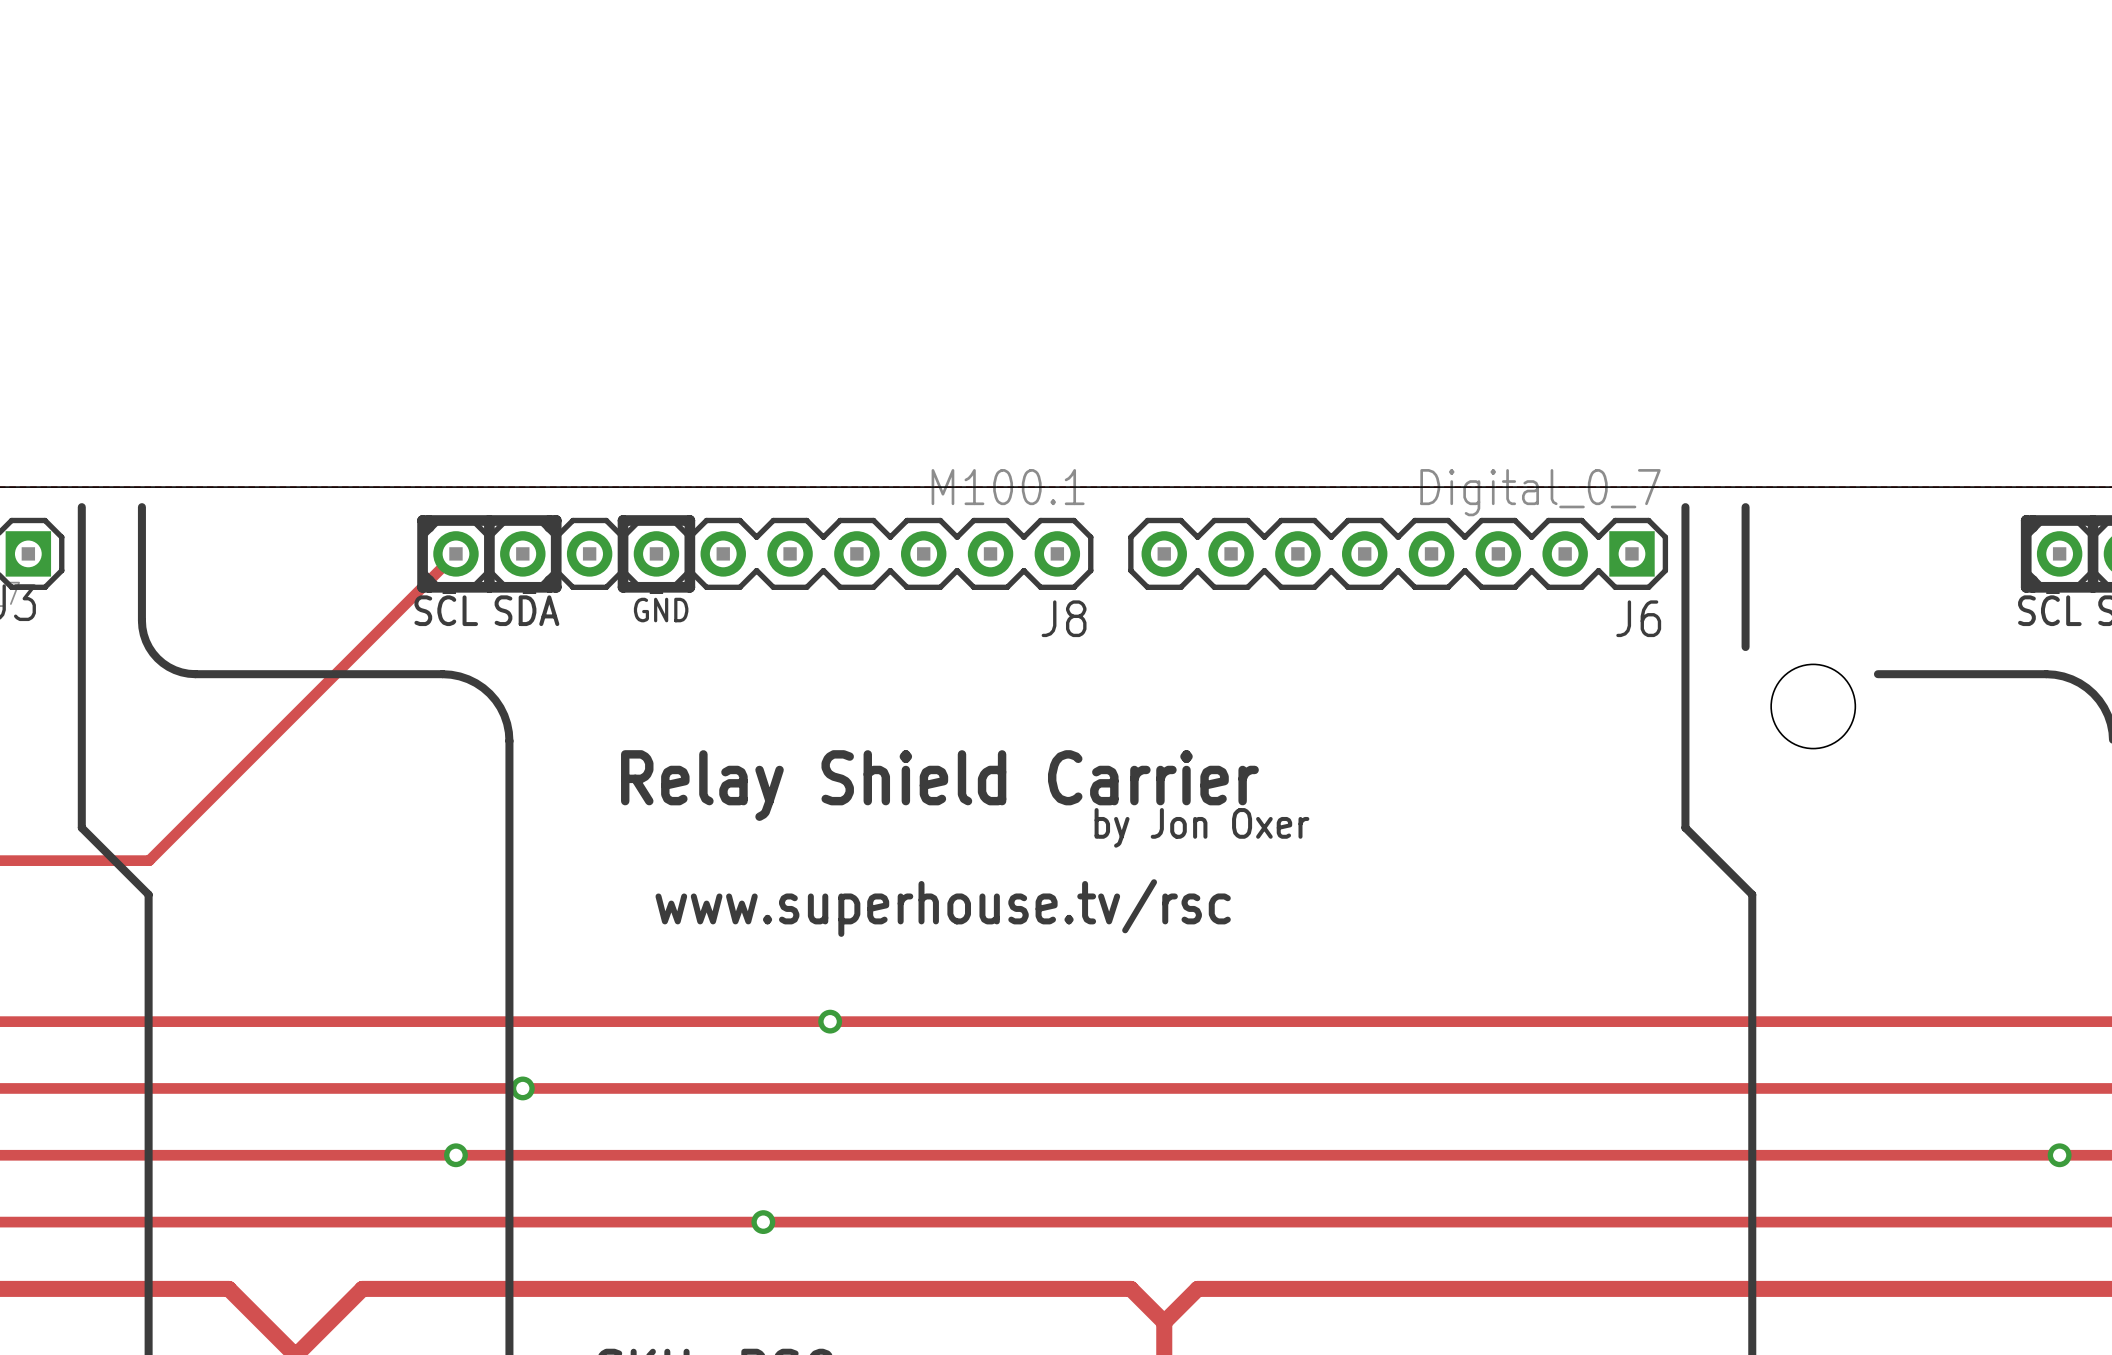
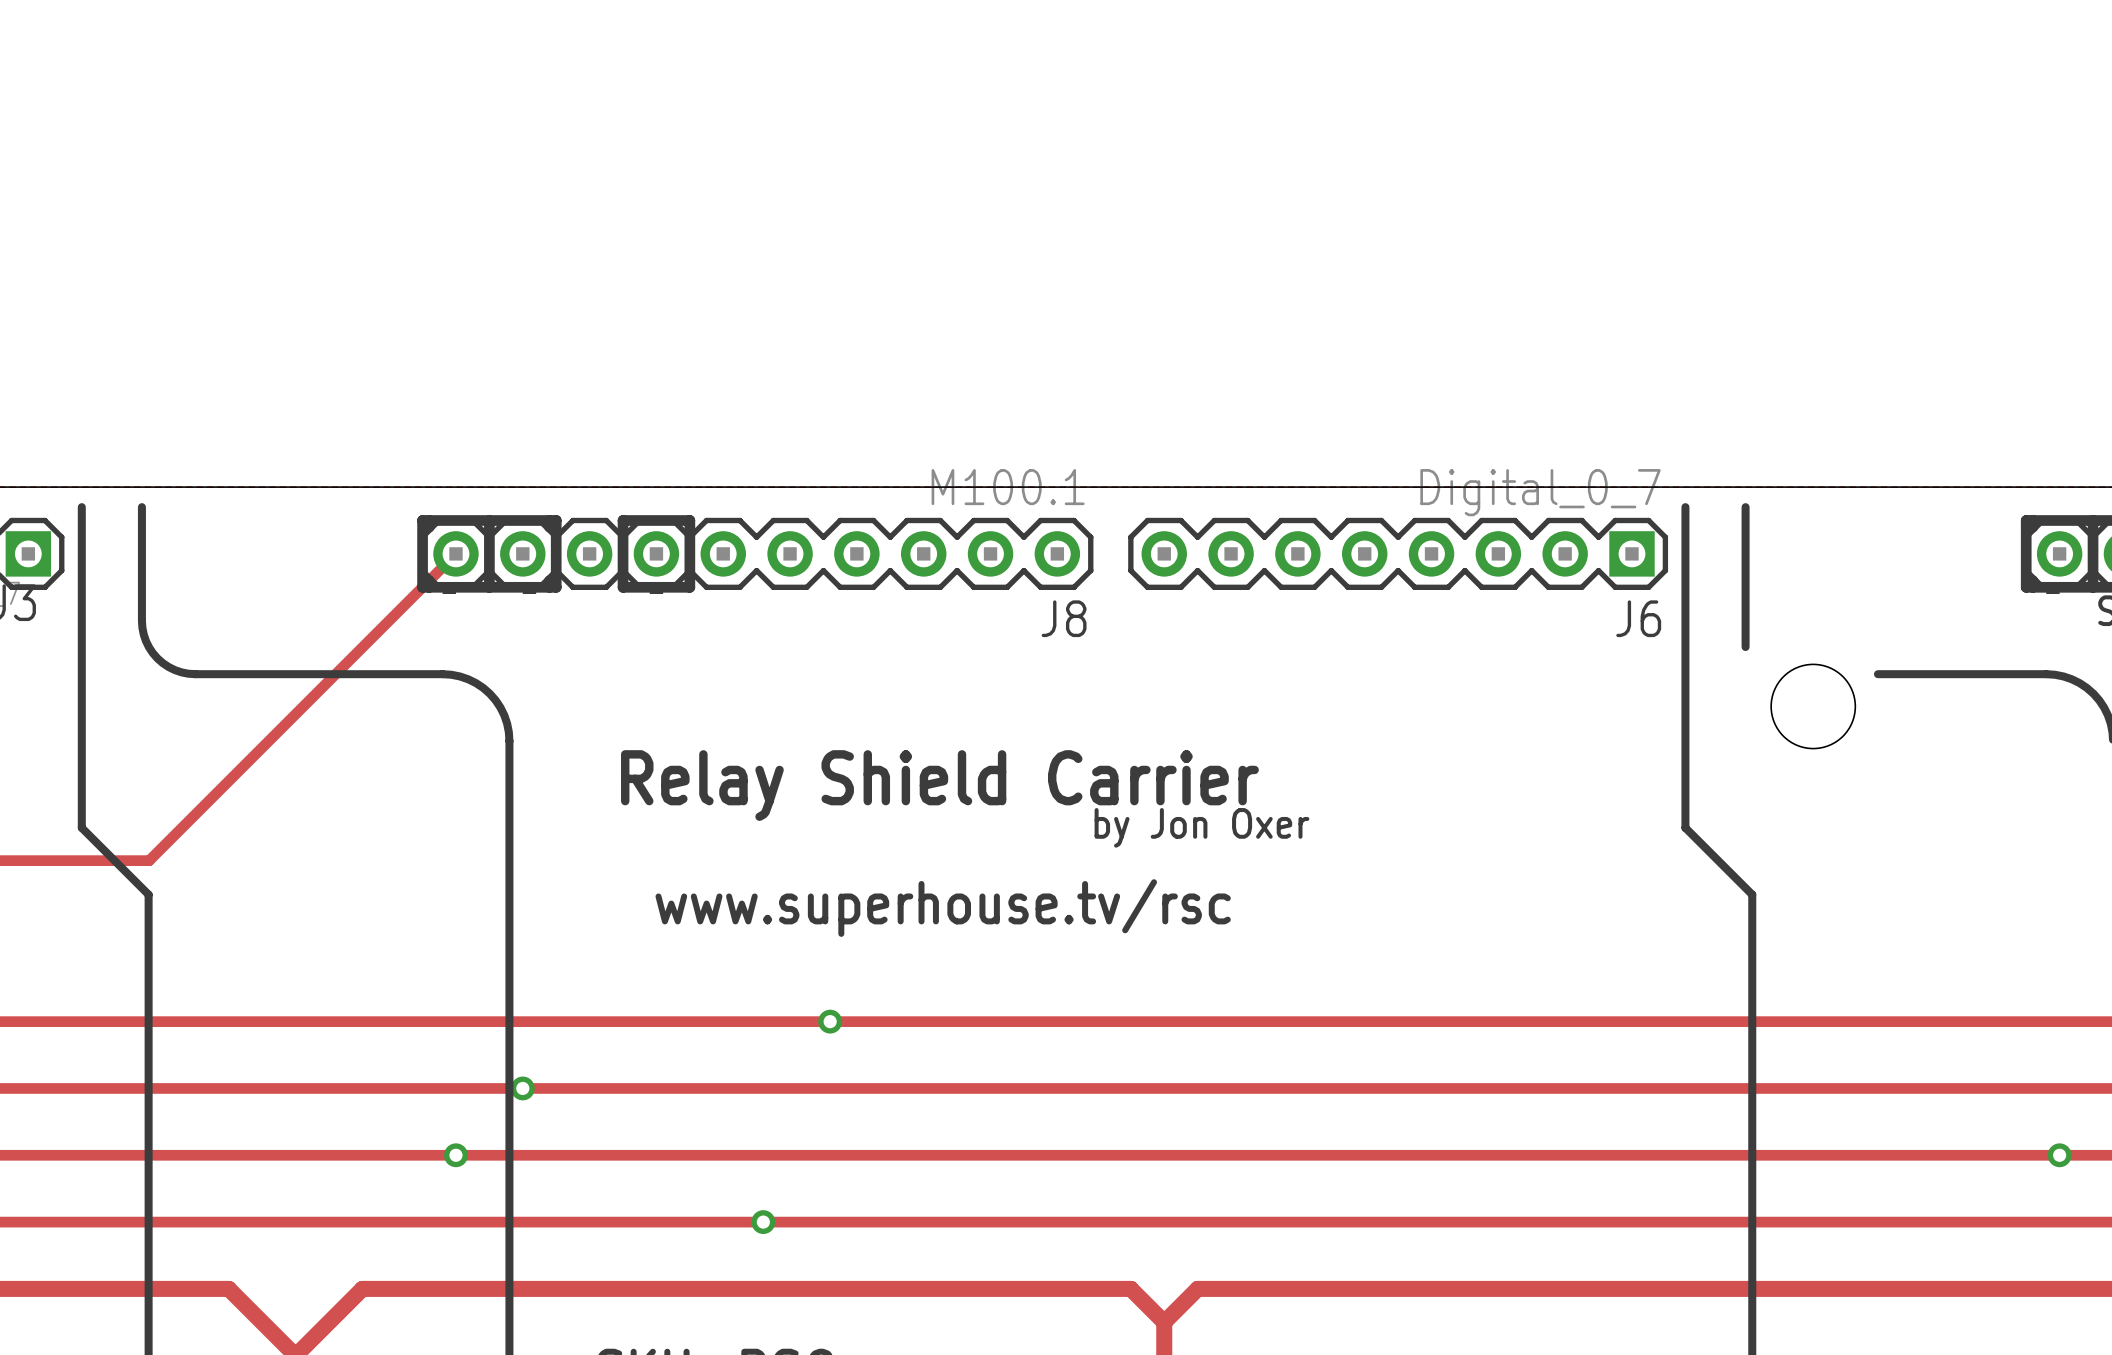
text: SCL (446, 610) -> none
text: SDA (526, 610) -> none
text: GND (661, 610) -> none
text: SCL (2049, 610) -> none

